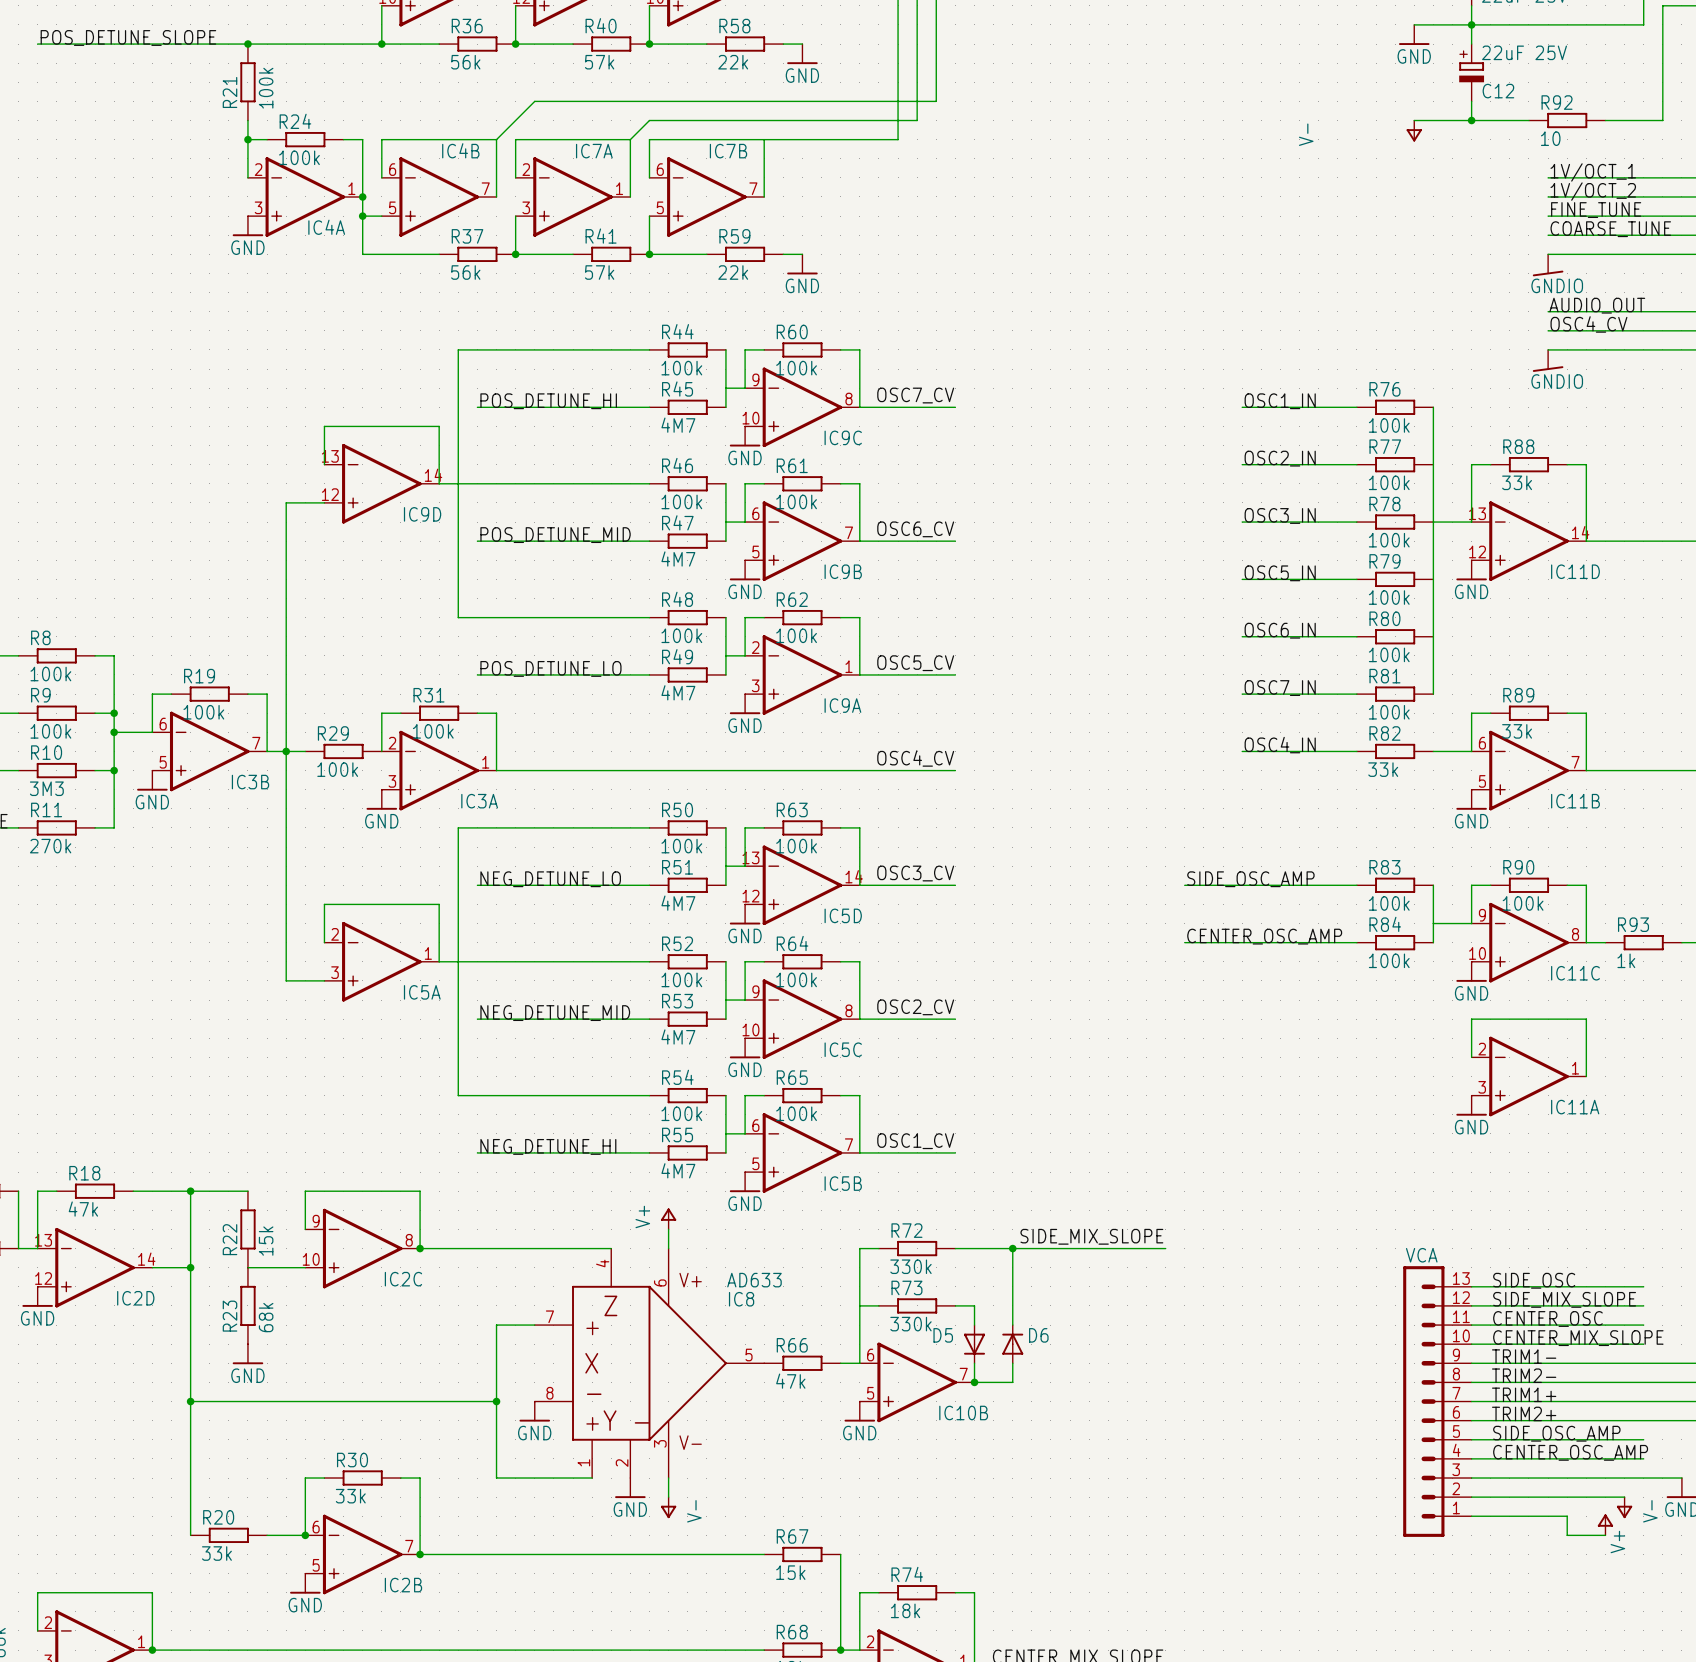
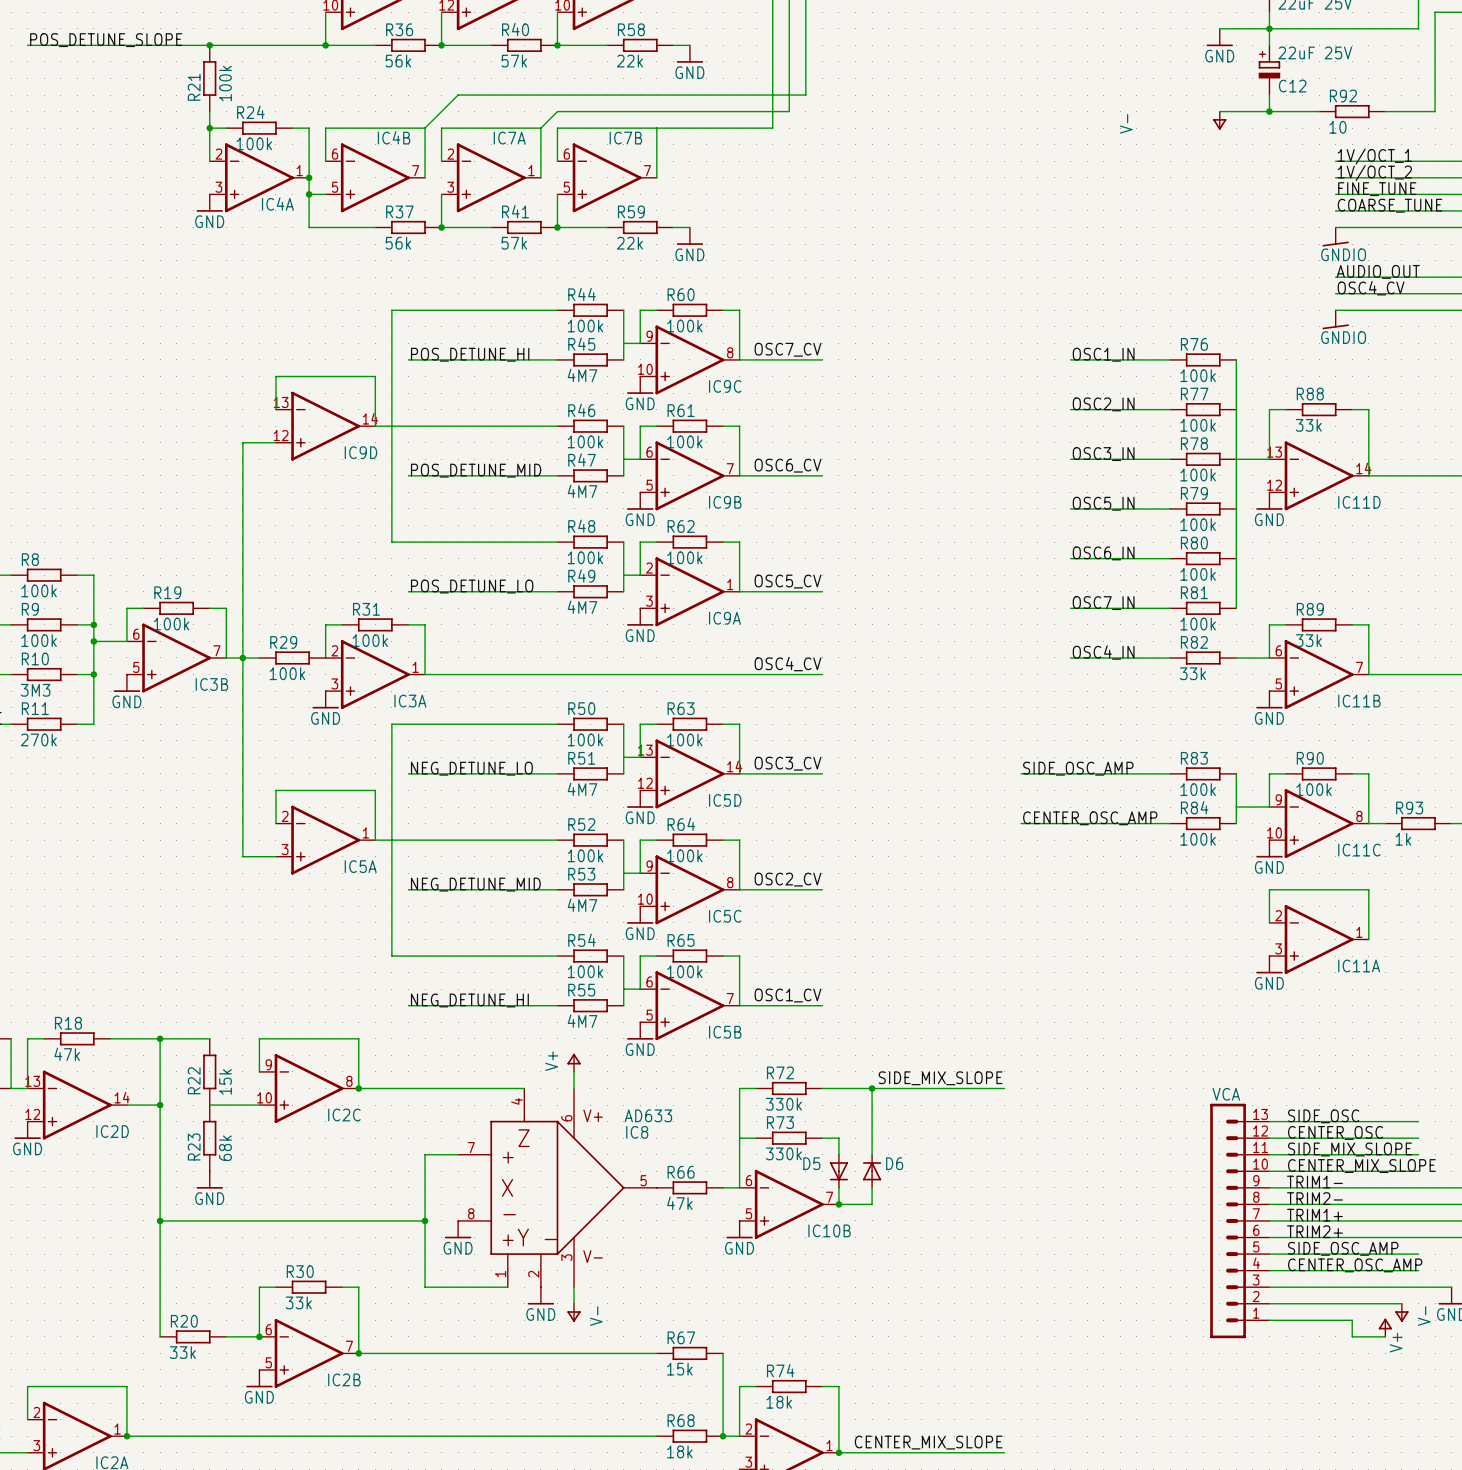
label: SIDE_MIX_SLOPE (1564, 1299) -> CENTER_OSC (1335, 1132)
label: CENTER_OSC (1547, 1318) -> SIDE_MIX_SLOPE (1349, 1149)

